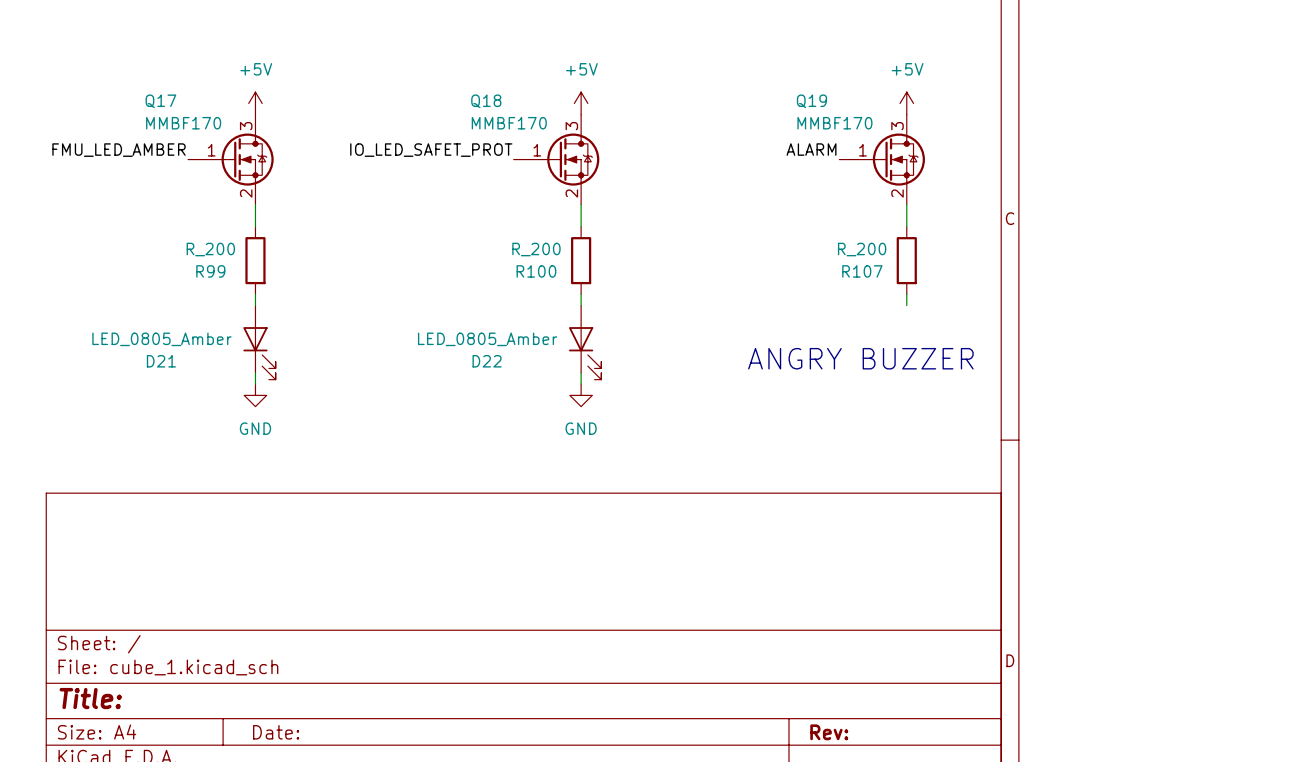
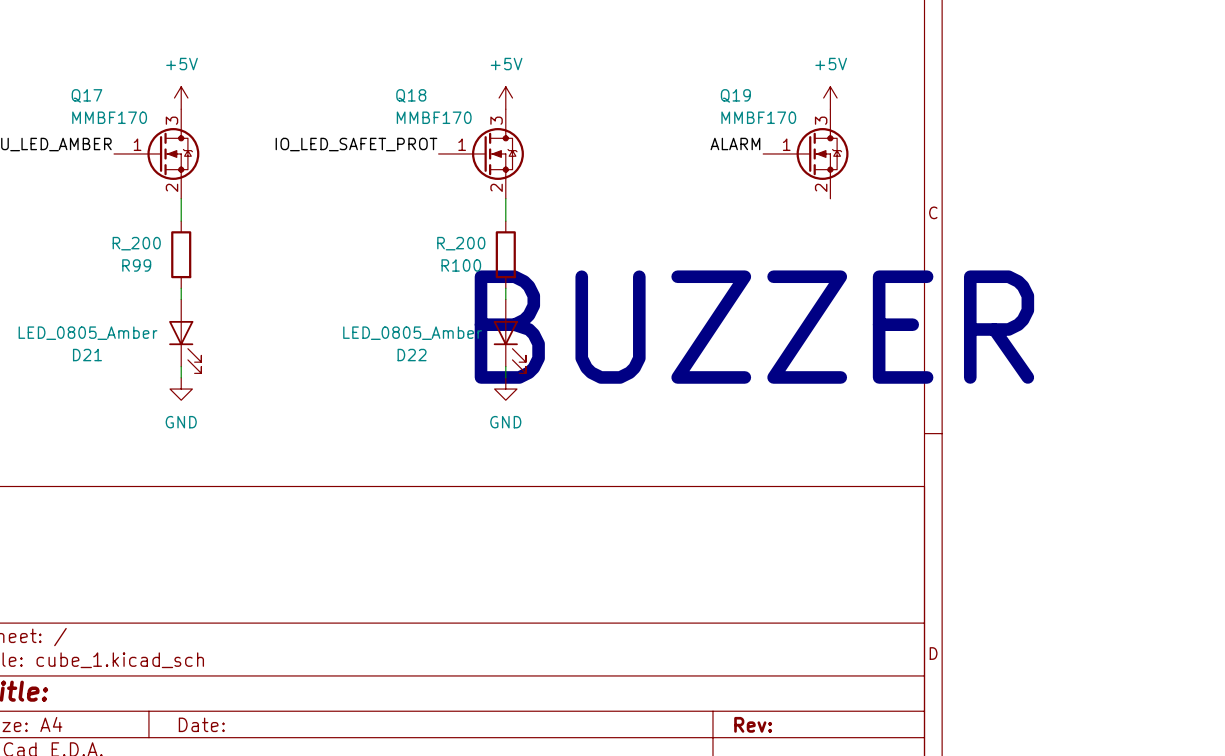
wire: (906, 204) (906, 226) -> none
R107: R_200 (906, 260) -> none
text: ANGRY BUZZER (860, 358) -> BUZZER (754, 327)

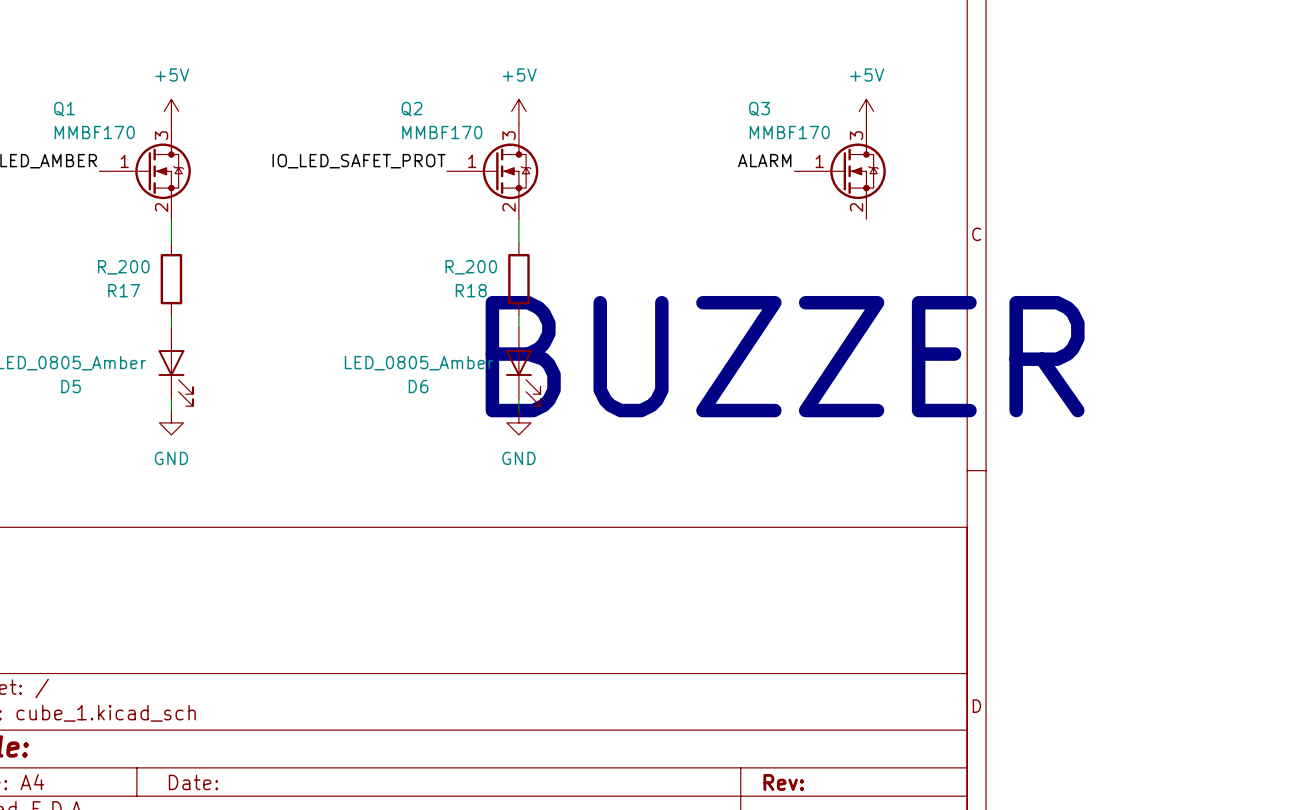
Q17 name: Q17 (86, 95) -> Q1 (64, 109)
Q18 name: Q18 (411, 95) -> Q2 (412, 109)
Q19 name: Q19 (735, 95) -> Q3 (759, 109)
R99 name: R99 (136, 265) -> R17 (124, 290)
R100 name: R100 (461, 265) -> R18 (471, 290)
D21 name: D21 (87, 355) -> D5 (71, 386)
D22 name: D22 (412, 355) -> D6 (418, 386)

